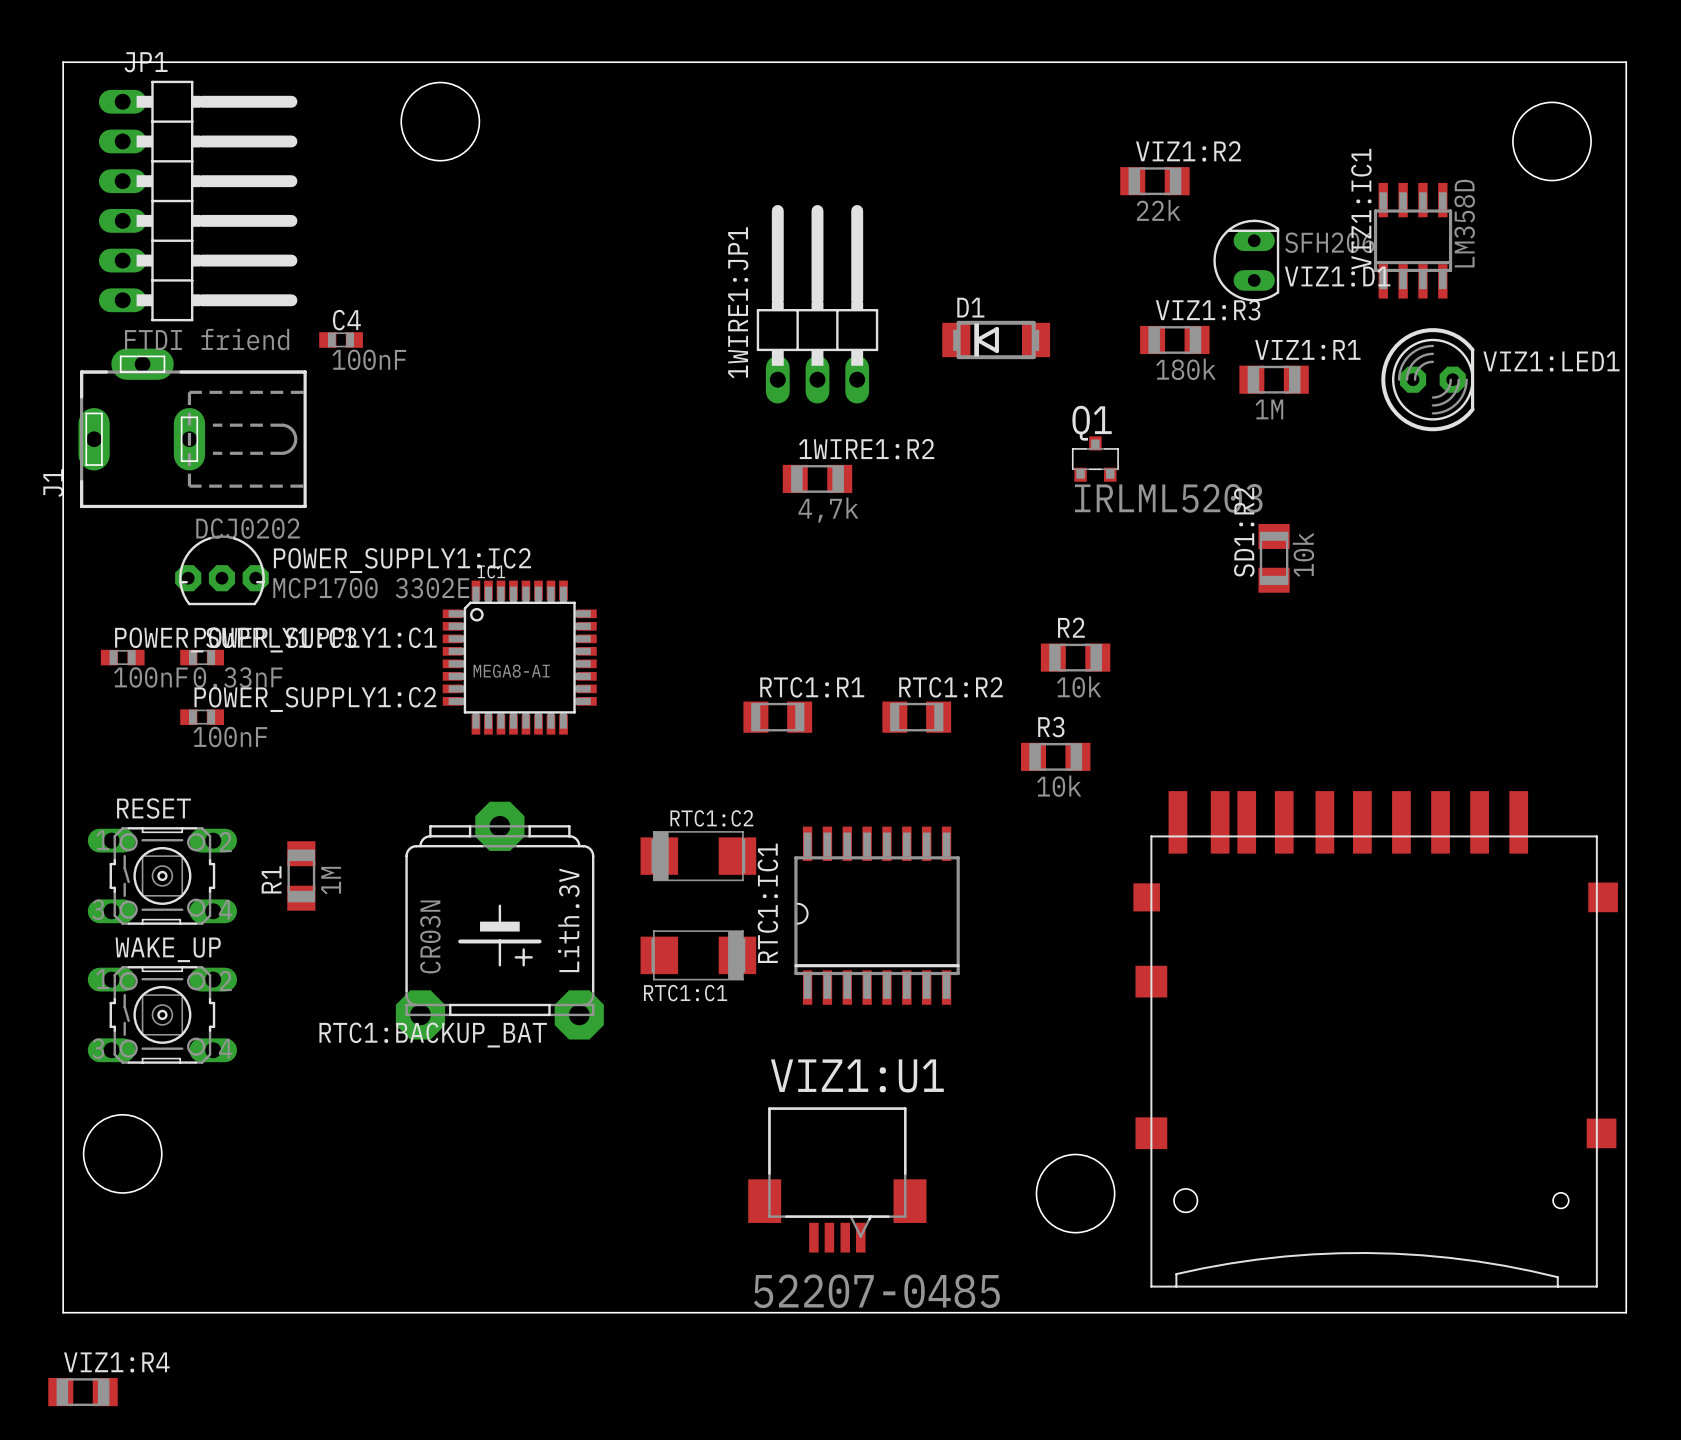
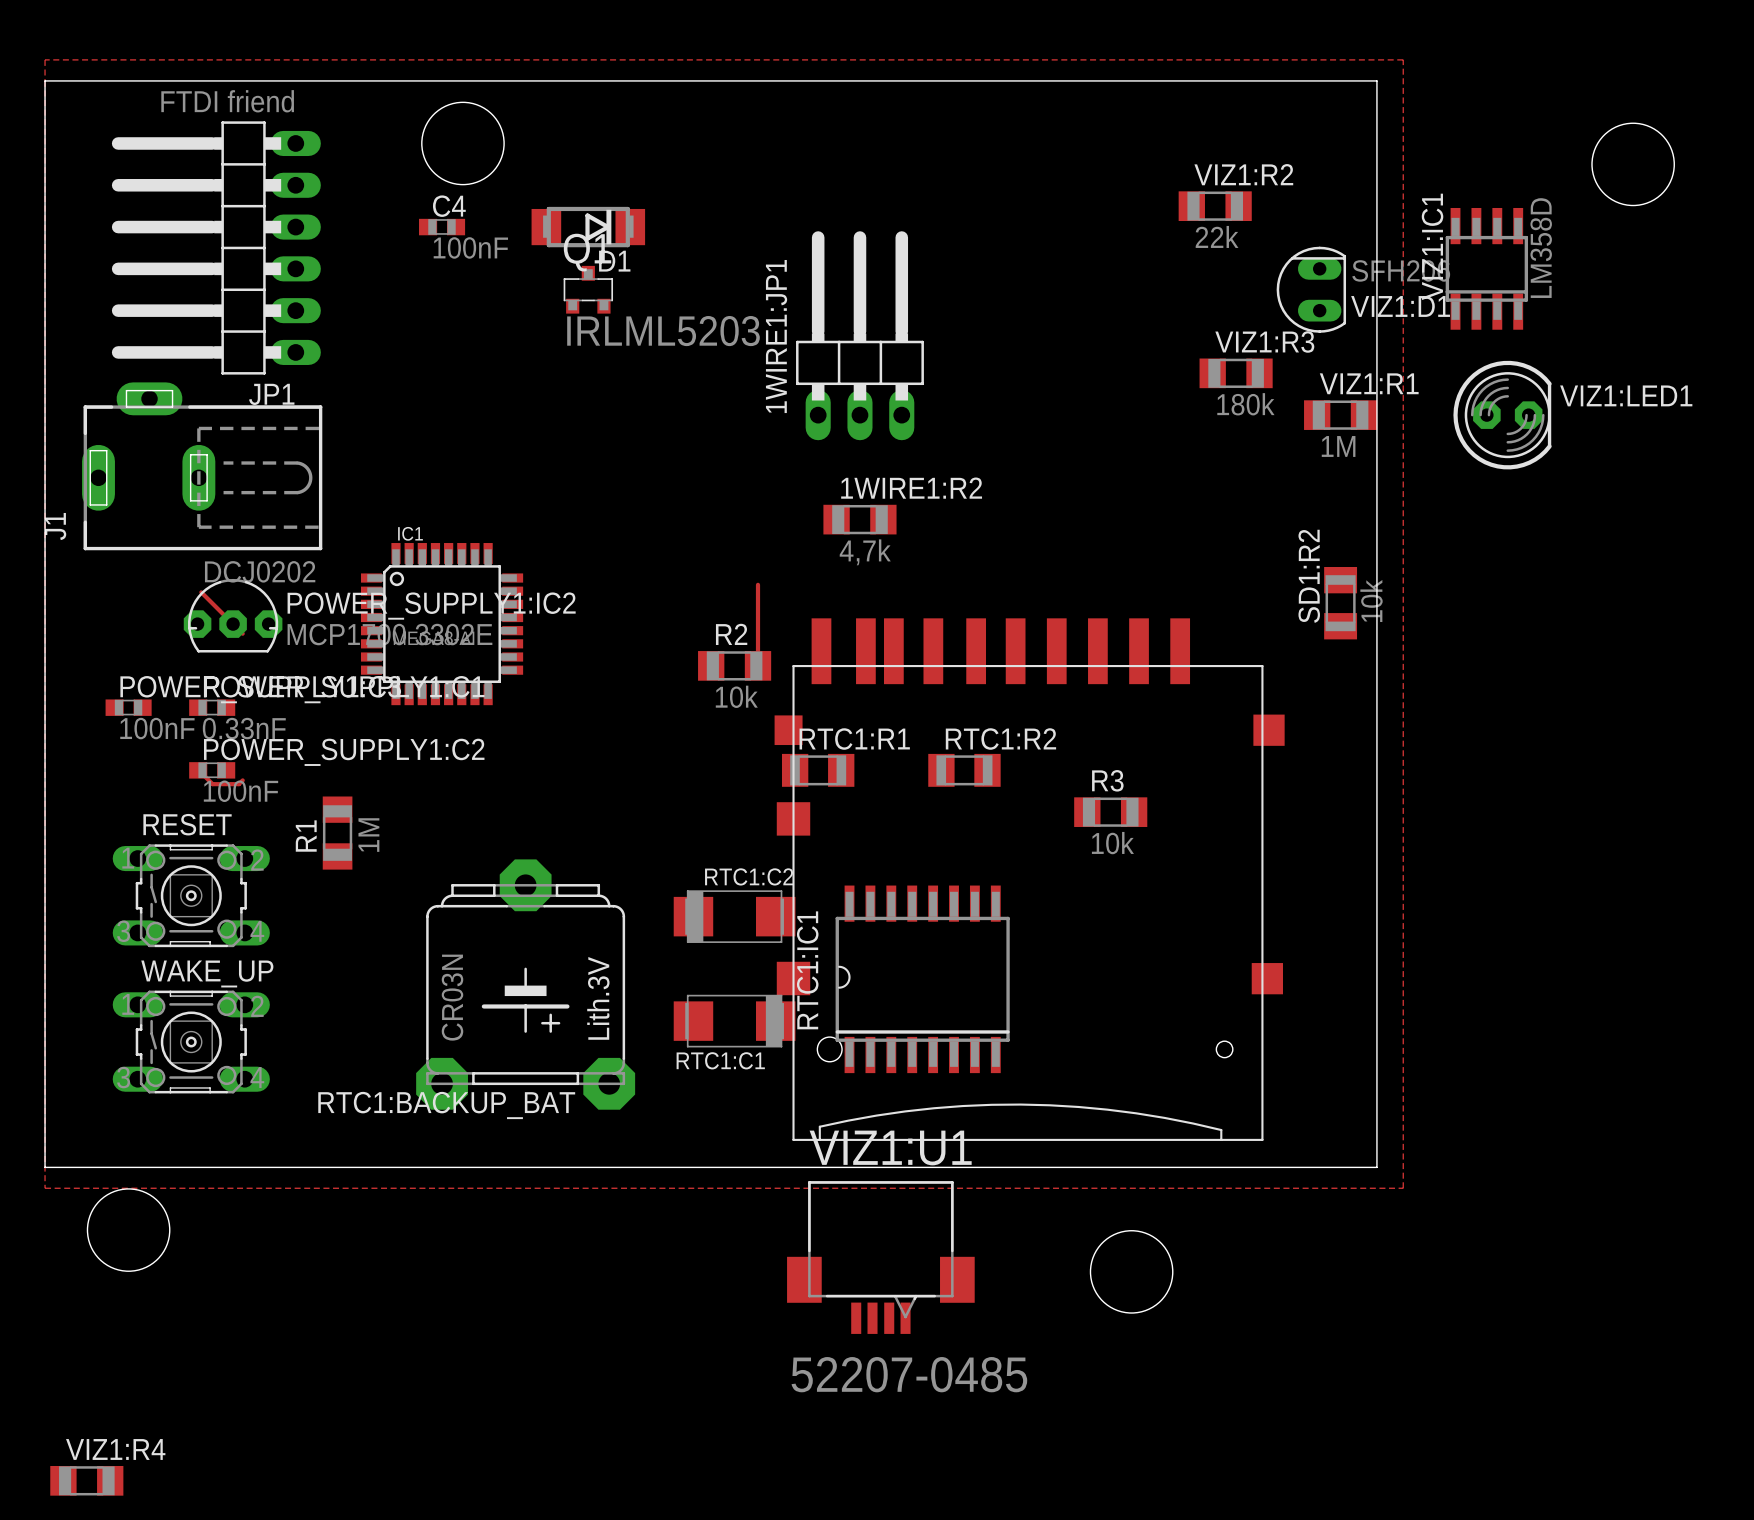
zone outline: none -> (45, 59) (1403, 59) (1403, 1188) (45, 1188) (45, 59)
board edge: (63, 62) (63, 1312) (1626, 1312) (1626, 62) (1308, 62) -> (65, 80) (45, 80) (45, 1167) (1376, 1167) (1376, 80)
JP1 rotation: 0° (198, 201) -> 180° (216, 247)
C4 position: (341, 339) -> (442, 227)
D1 rotation: 0° (996, 339) -> 180° (588, 227)
D1 position: (996, 339) -> (588, 227)
Q1 position: (1095, 459) -> (588, 289)
track: none -> (758, 584) (757, 665)
track: none -> (201, 592) (242, 633)
IC1 position: (519, 657) -> (442, 624)
R2 position: (1075, 657) -> (734, 665)
track: none -> (198, 770) (212, 784) (238, 784) (242, 780)
part: none -> (1029, 879)
RESET position: (162, 875) -> (191, 895)
R1 position: (301, 875) -> (337, 833)
WAKE_UP position: (162, 1014) -> (191, 1042)
part: (1375, 1039) -> none

